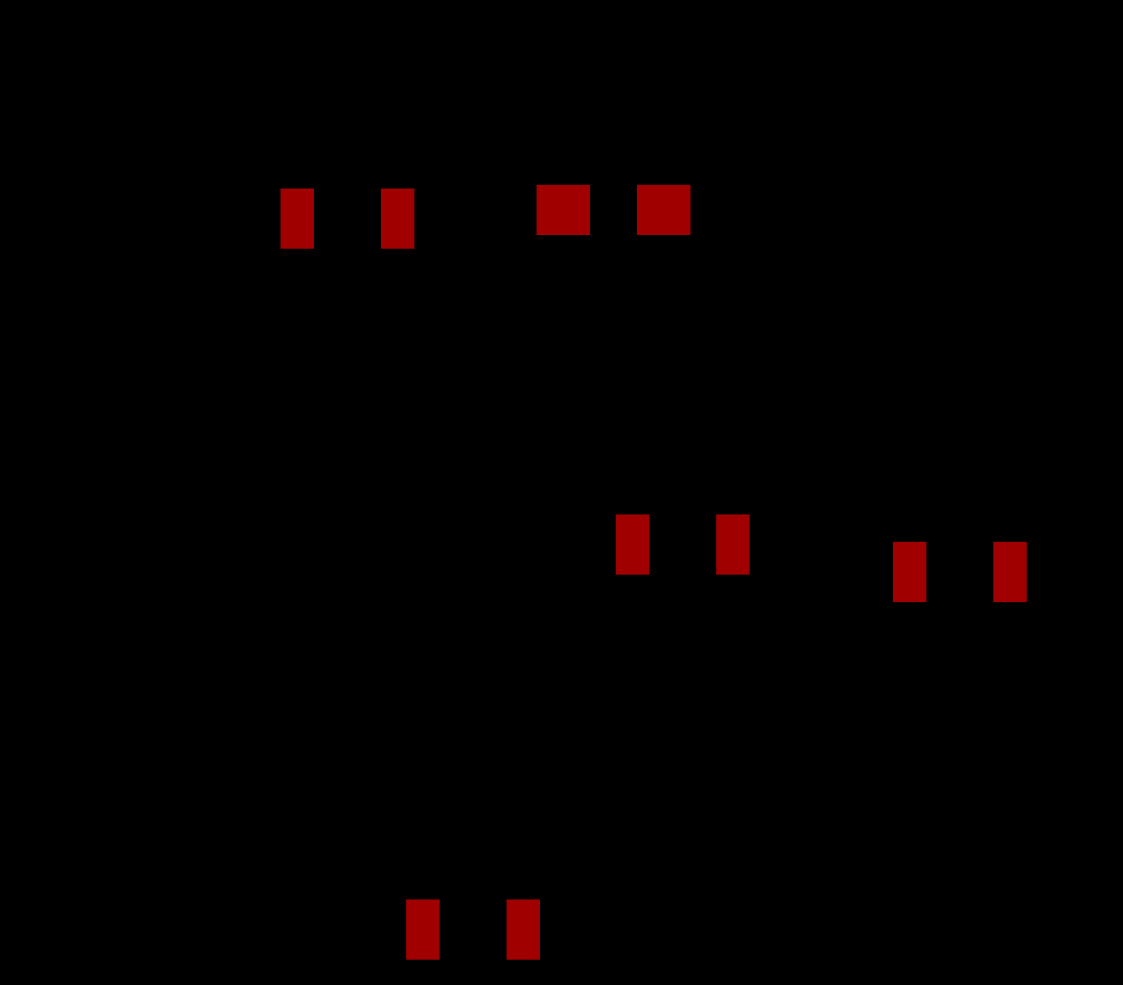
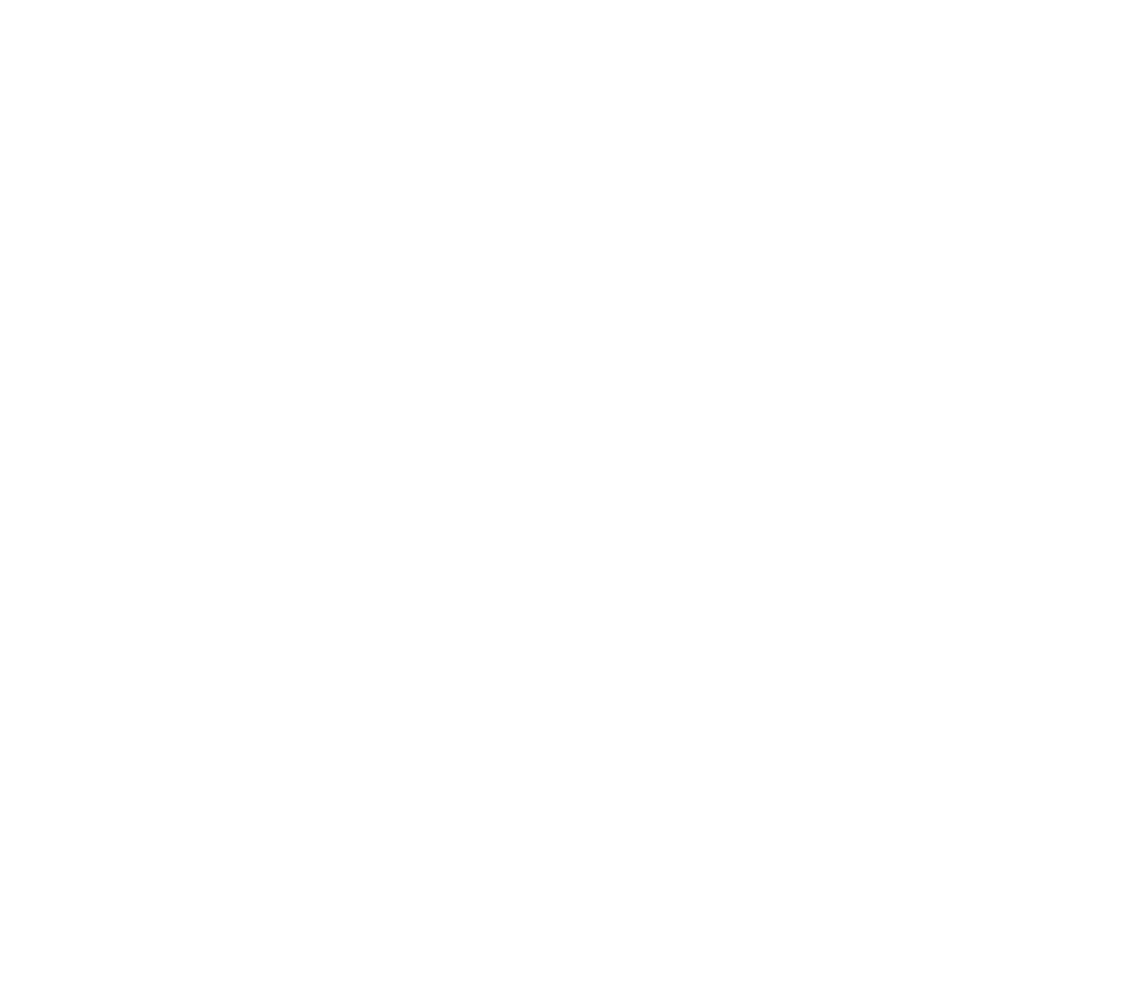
part: (613, 209) -> none
part: (347, 218) -> none
part: (682, 544) -> none
part: (959, 571) -> none
part: (473, 929) -> none

